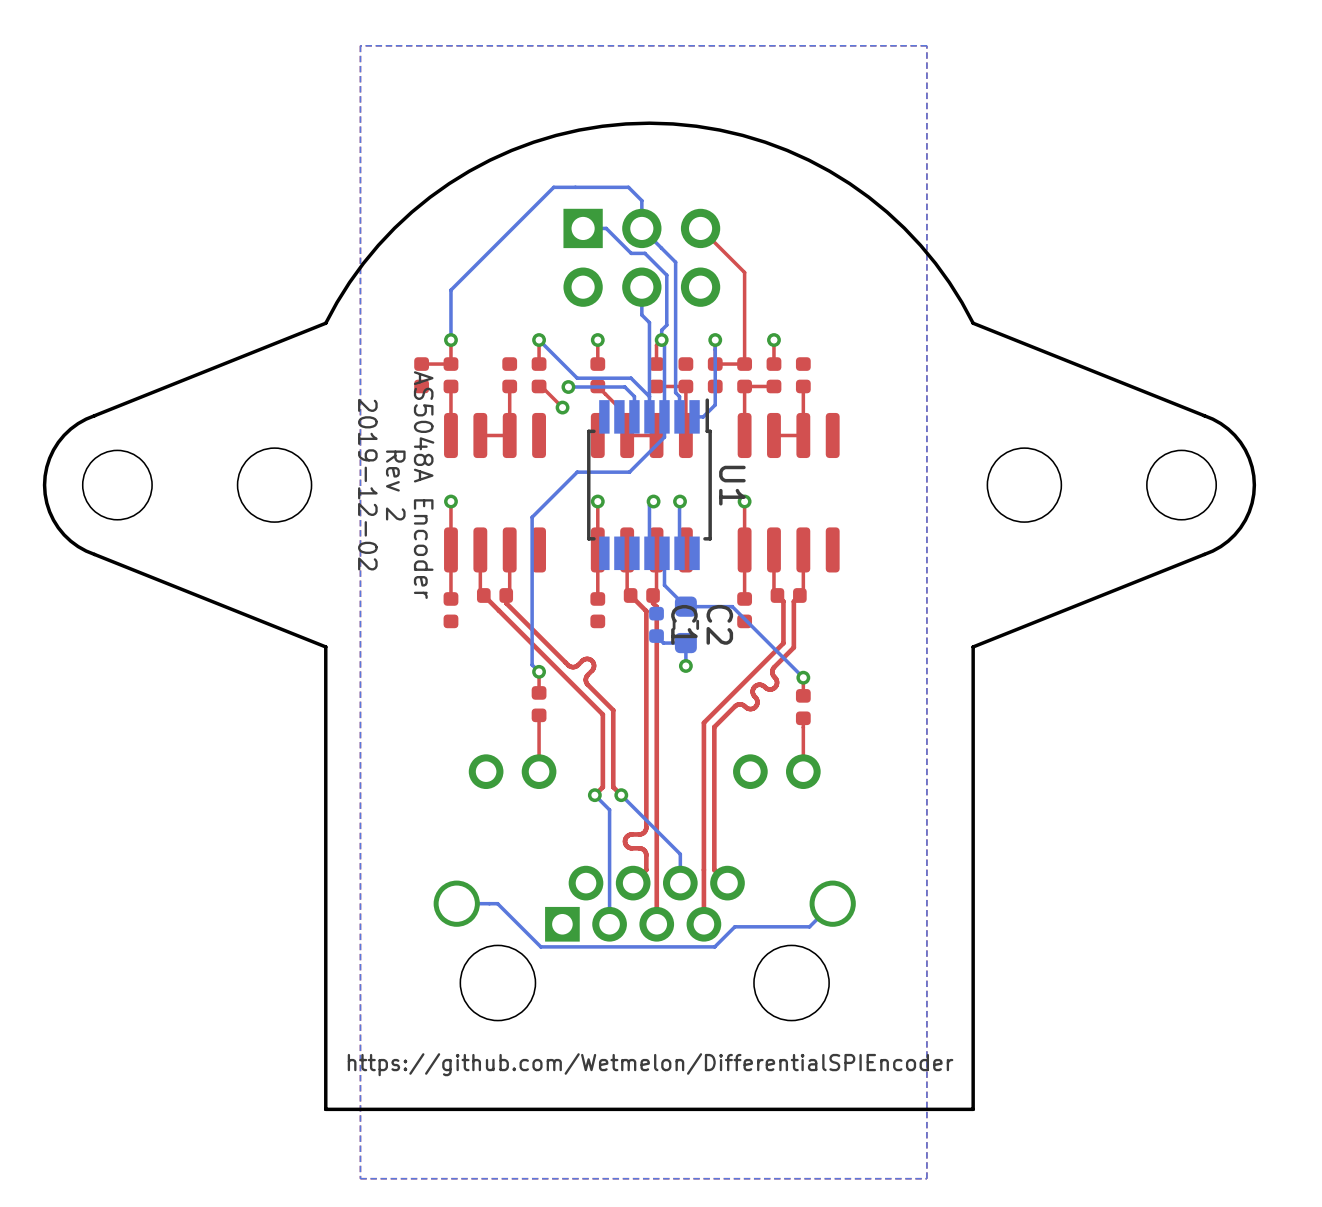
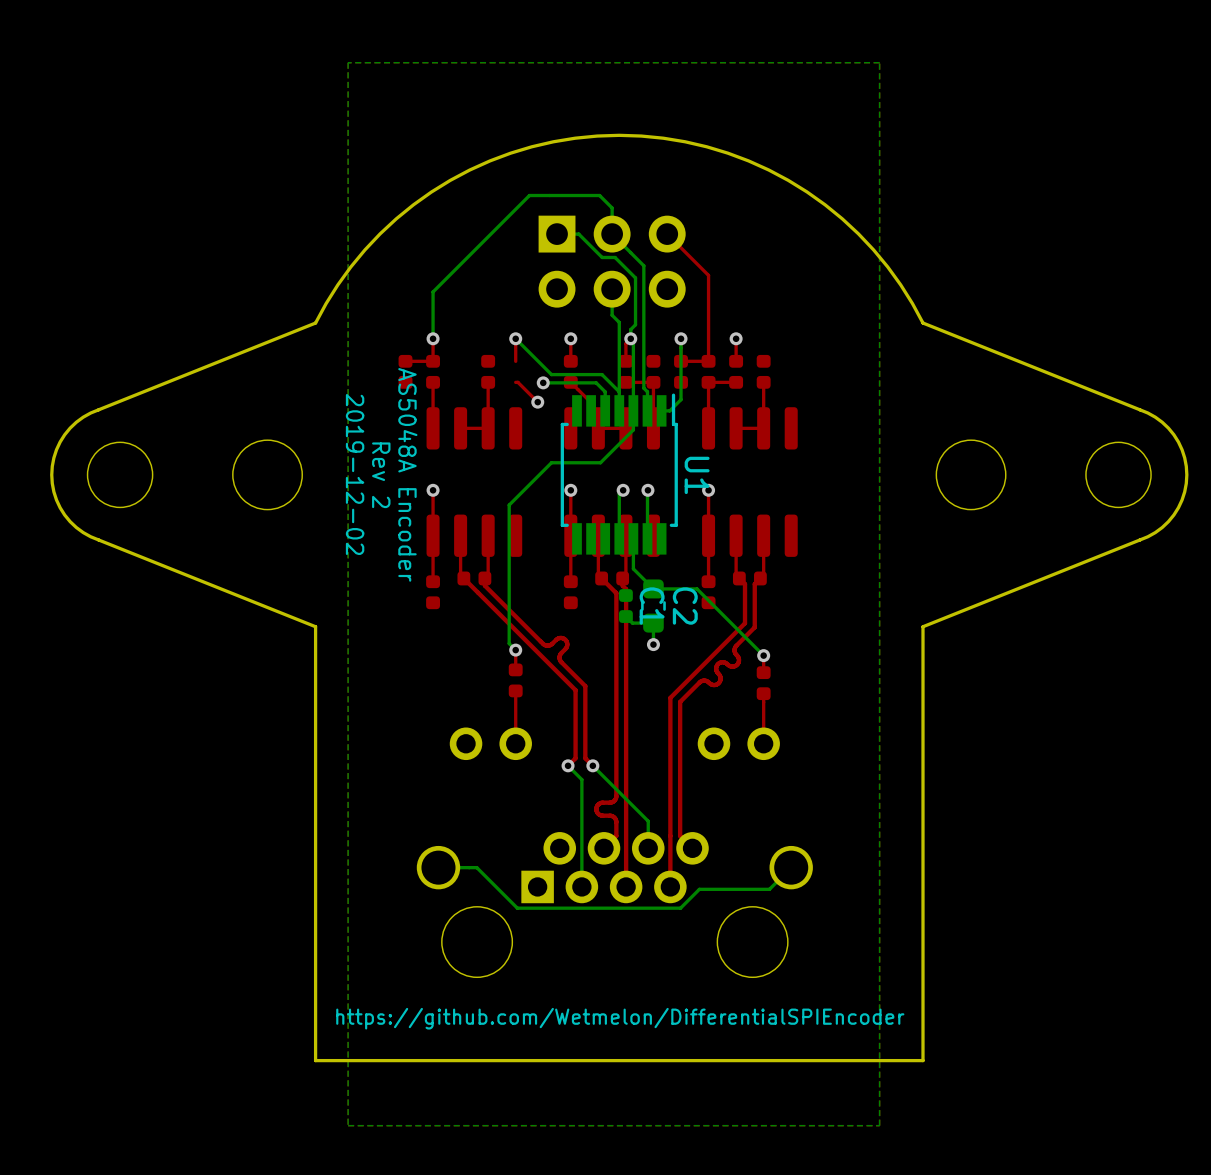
part: (539, 375) -> none

